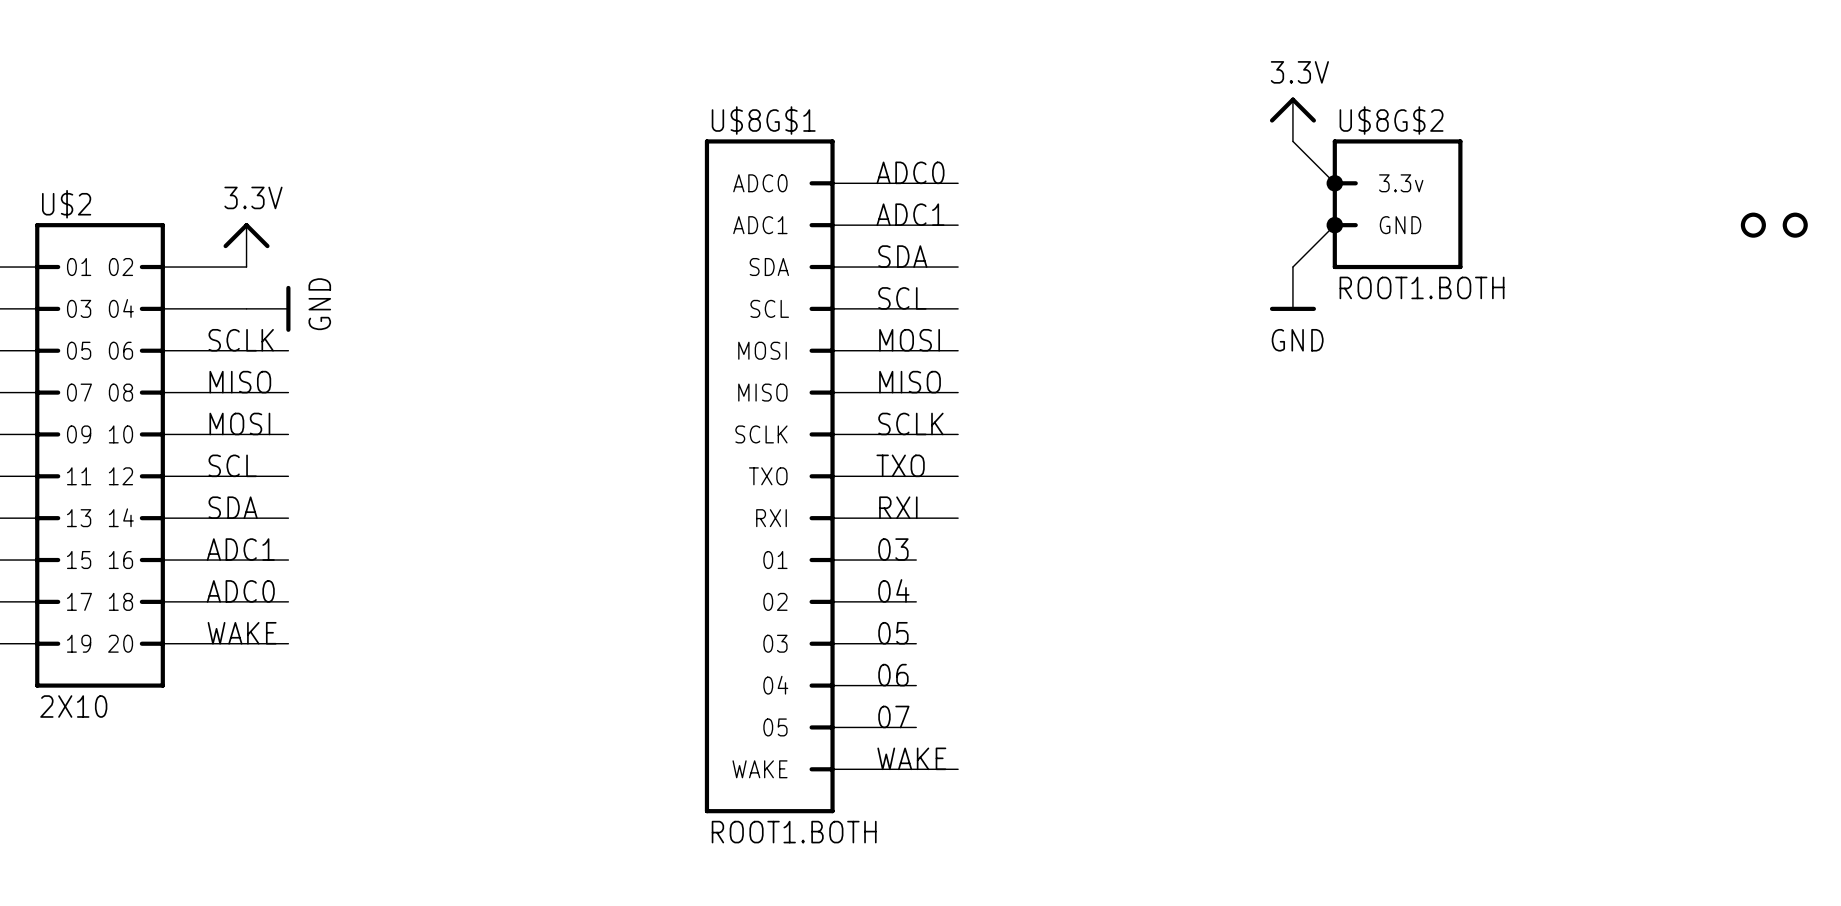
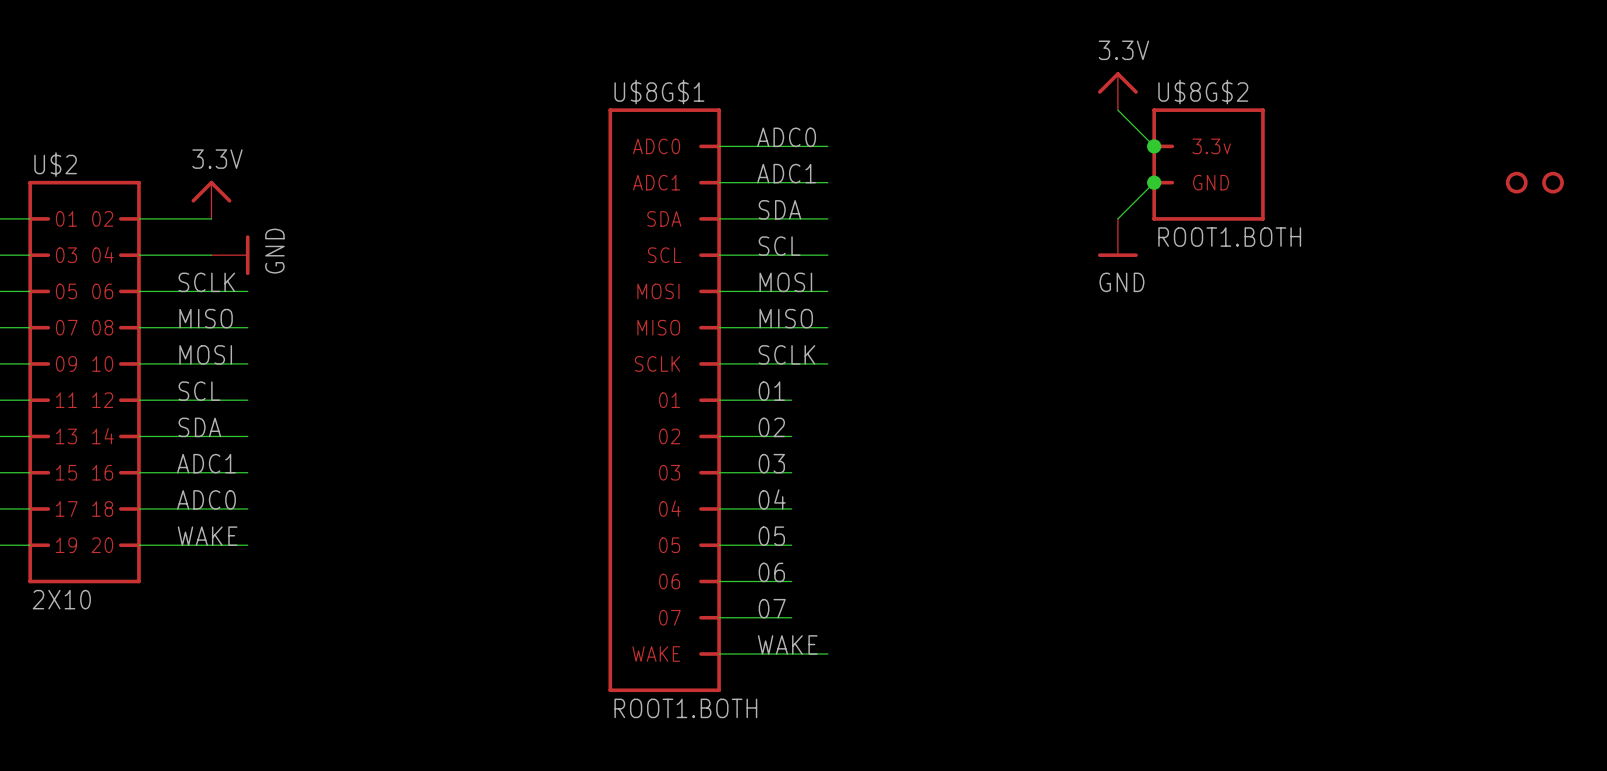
label: TXO (900, 465) -> 01 (771, 391)
U$8G$1 text: TXO (768, 476) -> 01 (669, 400)
wire: (916, 476) (958, 476) -> none
label: RXI (898, 507) -> 02 (771, 427)
U$8G$1 text: RXI (771, 518) -> 02 (669, 436)
wire: (916, 518) (958, 518) -> none
U$8G$1 text: 01 (775, 560) -> 03 (669, 472)
U$8G$1 text: 02 (775, 601) -> 04 (669, 508)
U$8G$1 text: 03 (775, 643) -> 05 (669, 545)
U$8G$1 text: 04 (775, 685) -> 06 (669, 581)
U$8G$1 text: 05 (775, 727) -> 07 (669, 617)

